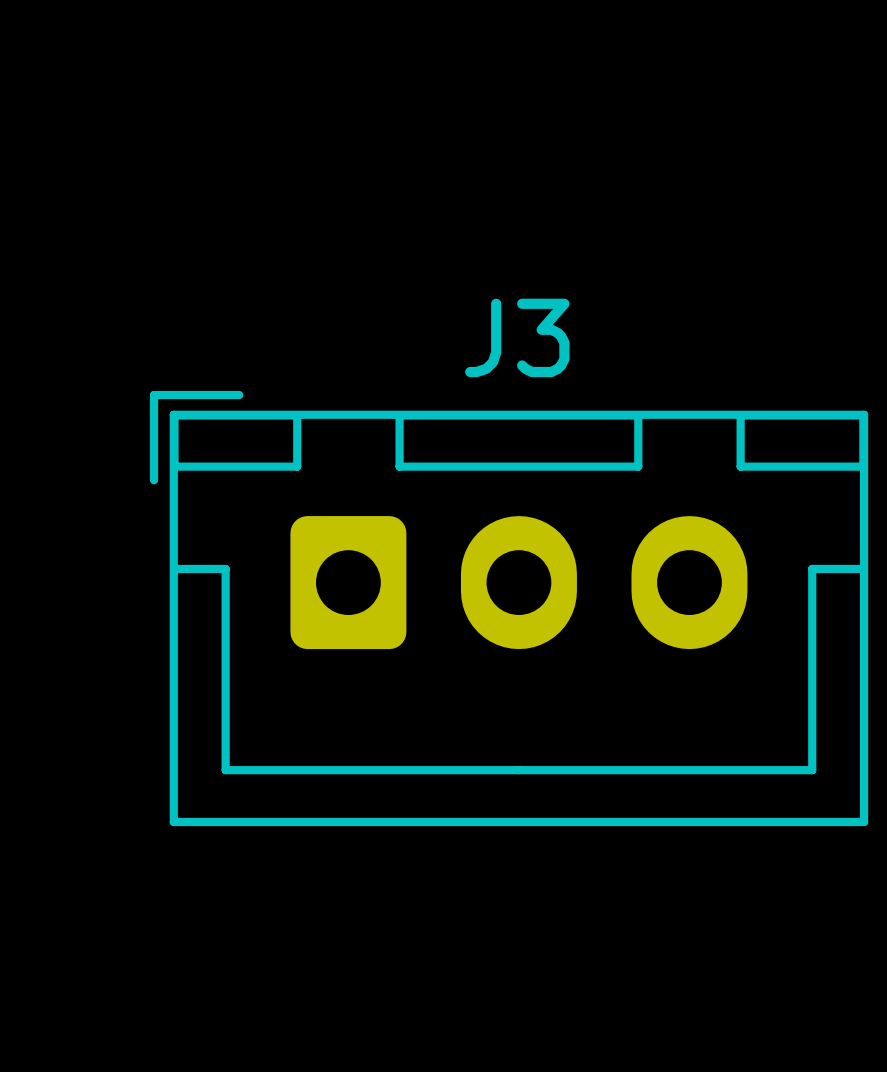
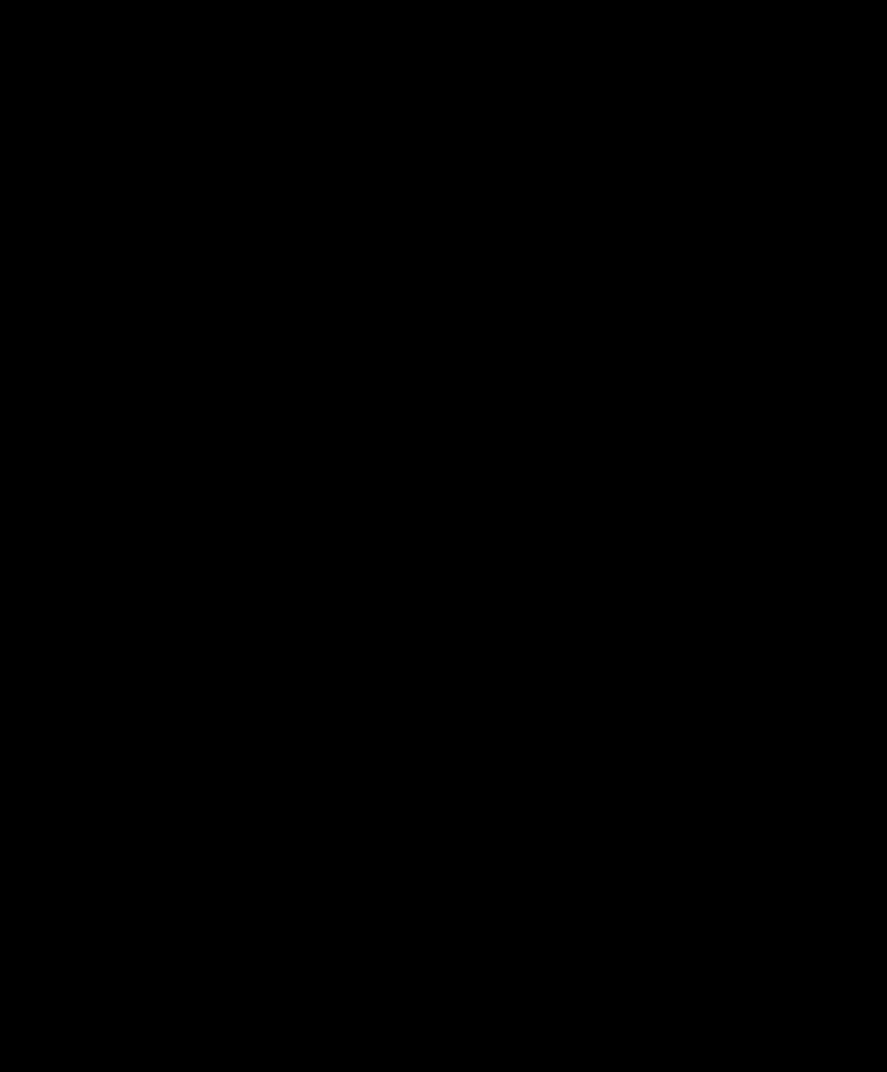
J3: (509, 608) -> none

